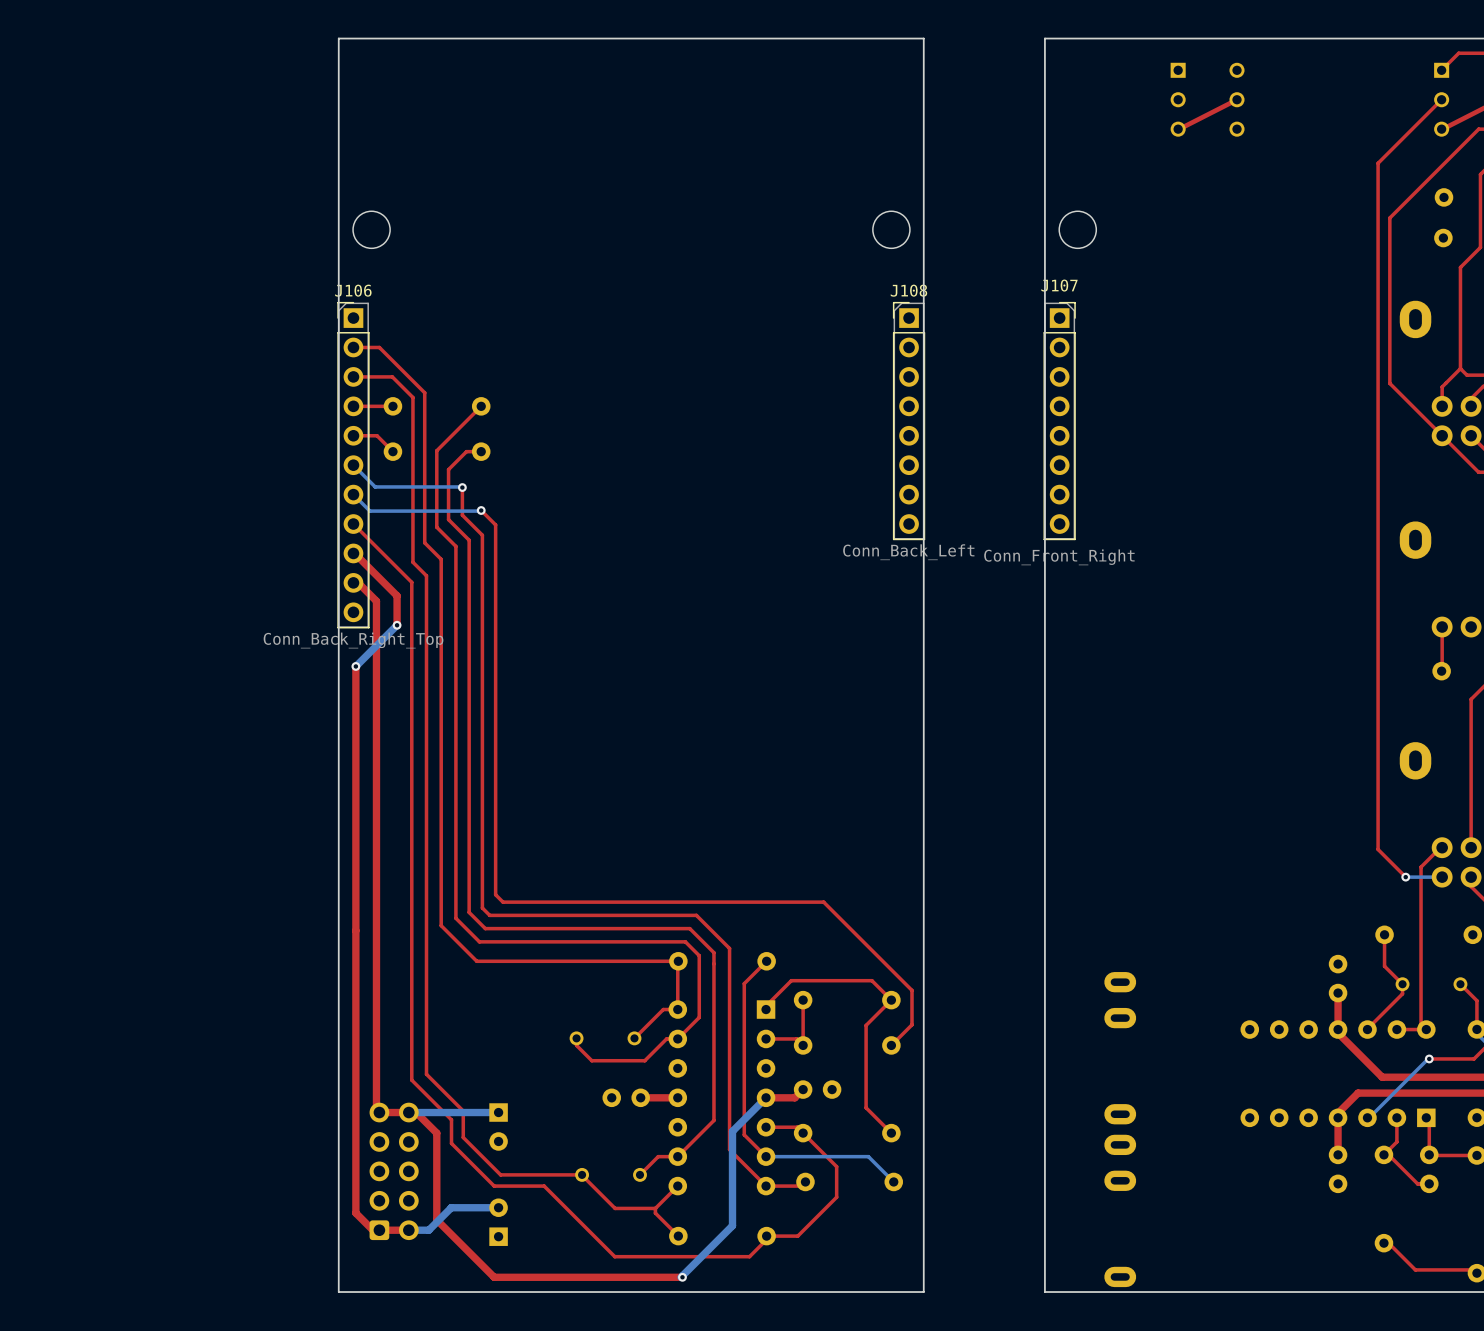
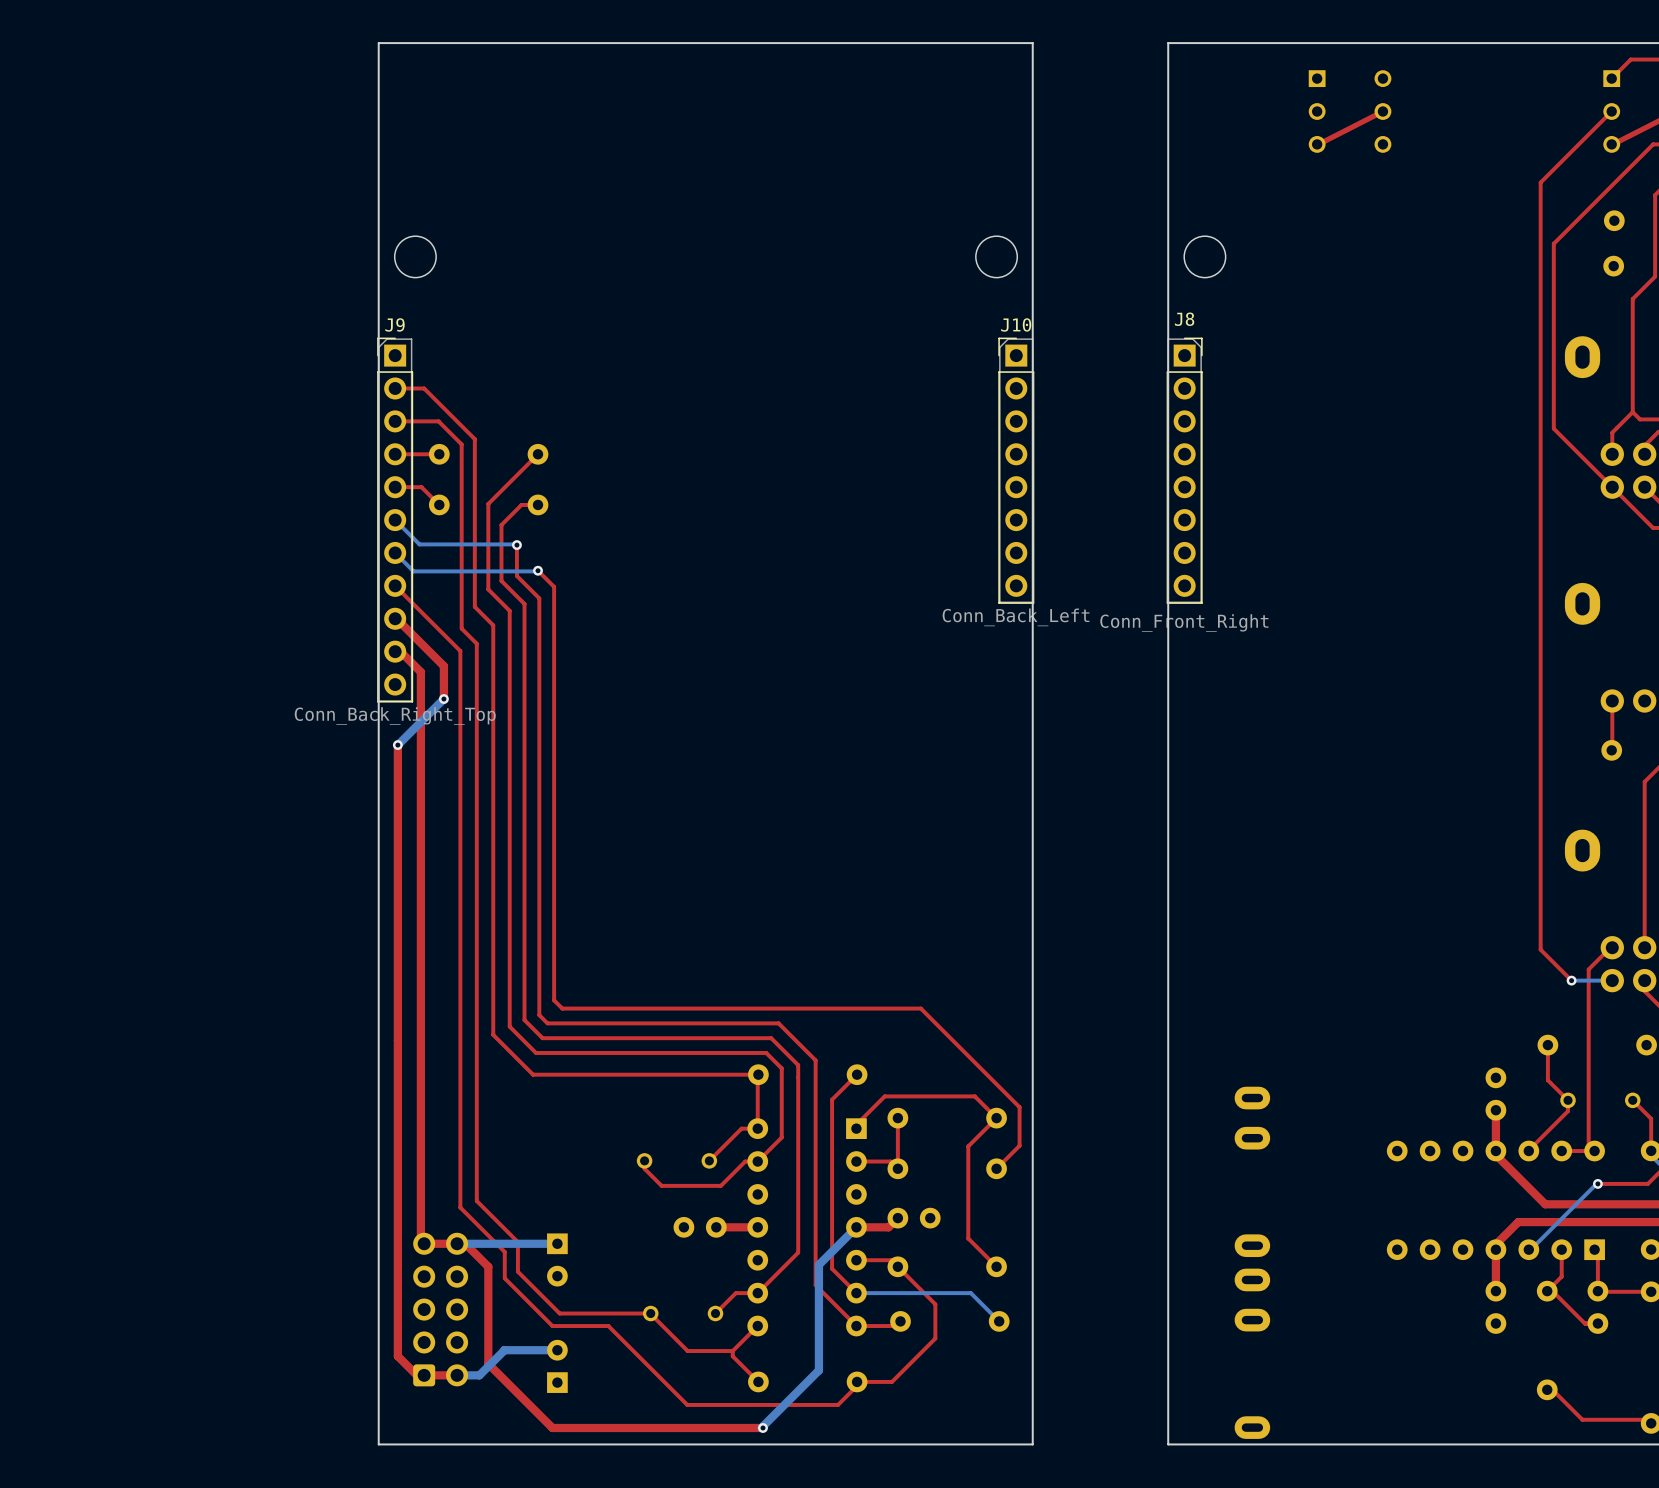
J107 name: J107 (1059, 285) -> J8 (1184, 319)
J106 name: J106 (353, 290) -> J9 (395, 324)
J108 name: J108 (908, 290) -> J10 (1016, 324)

